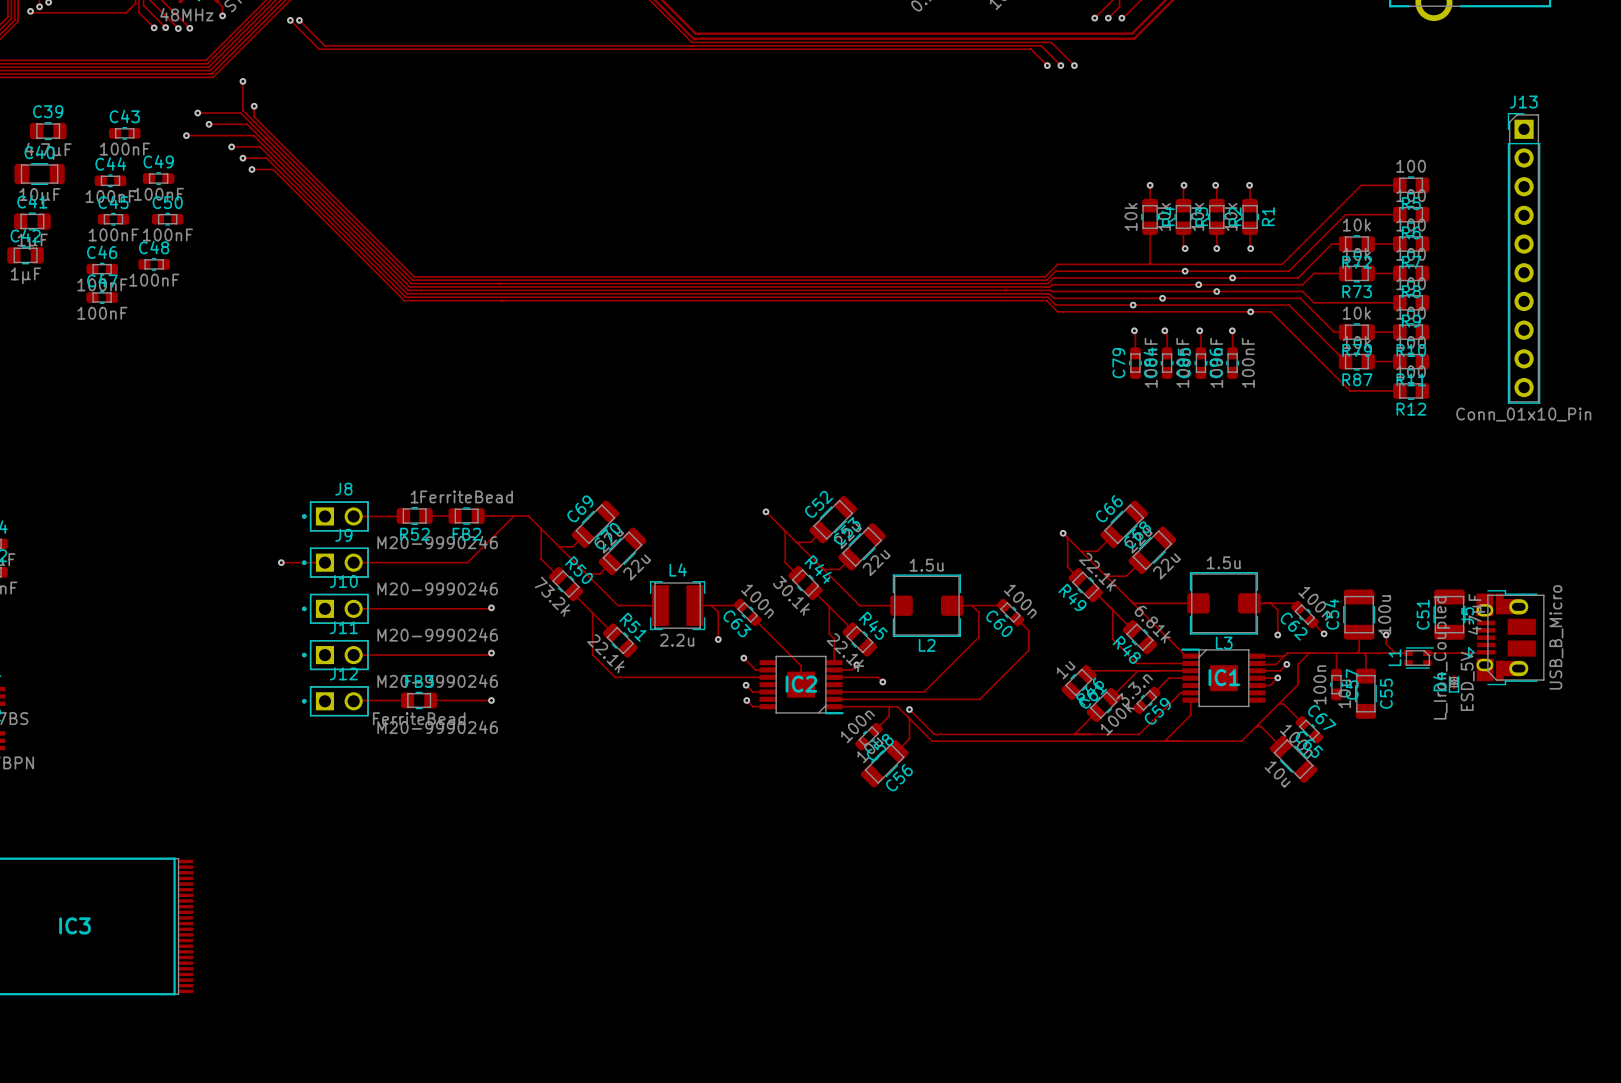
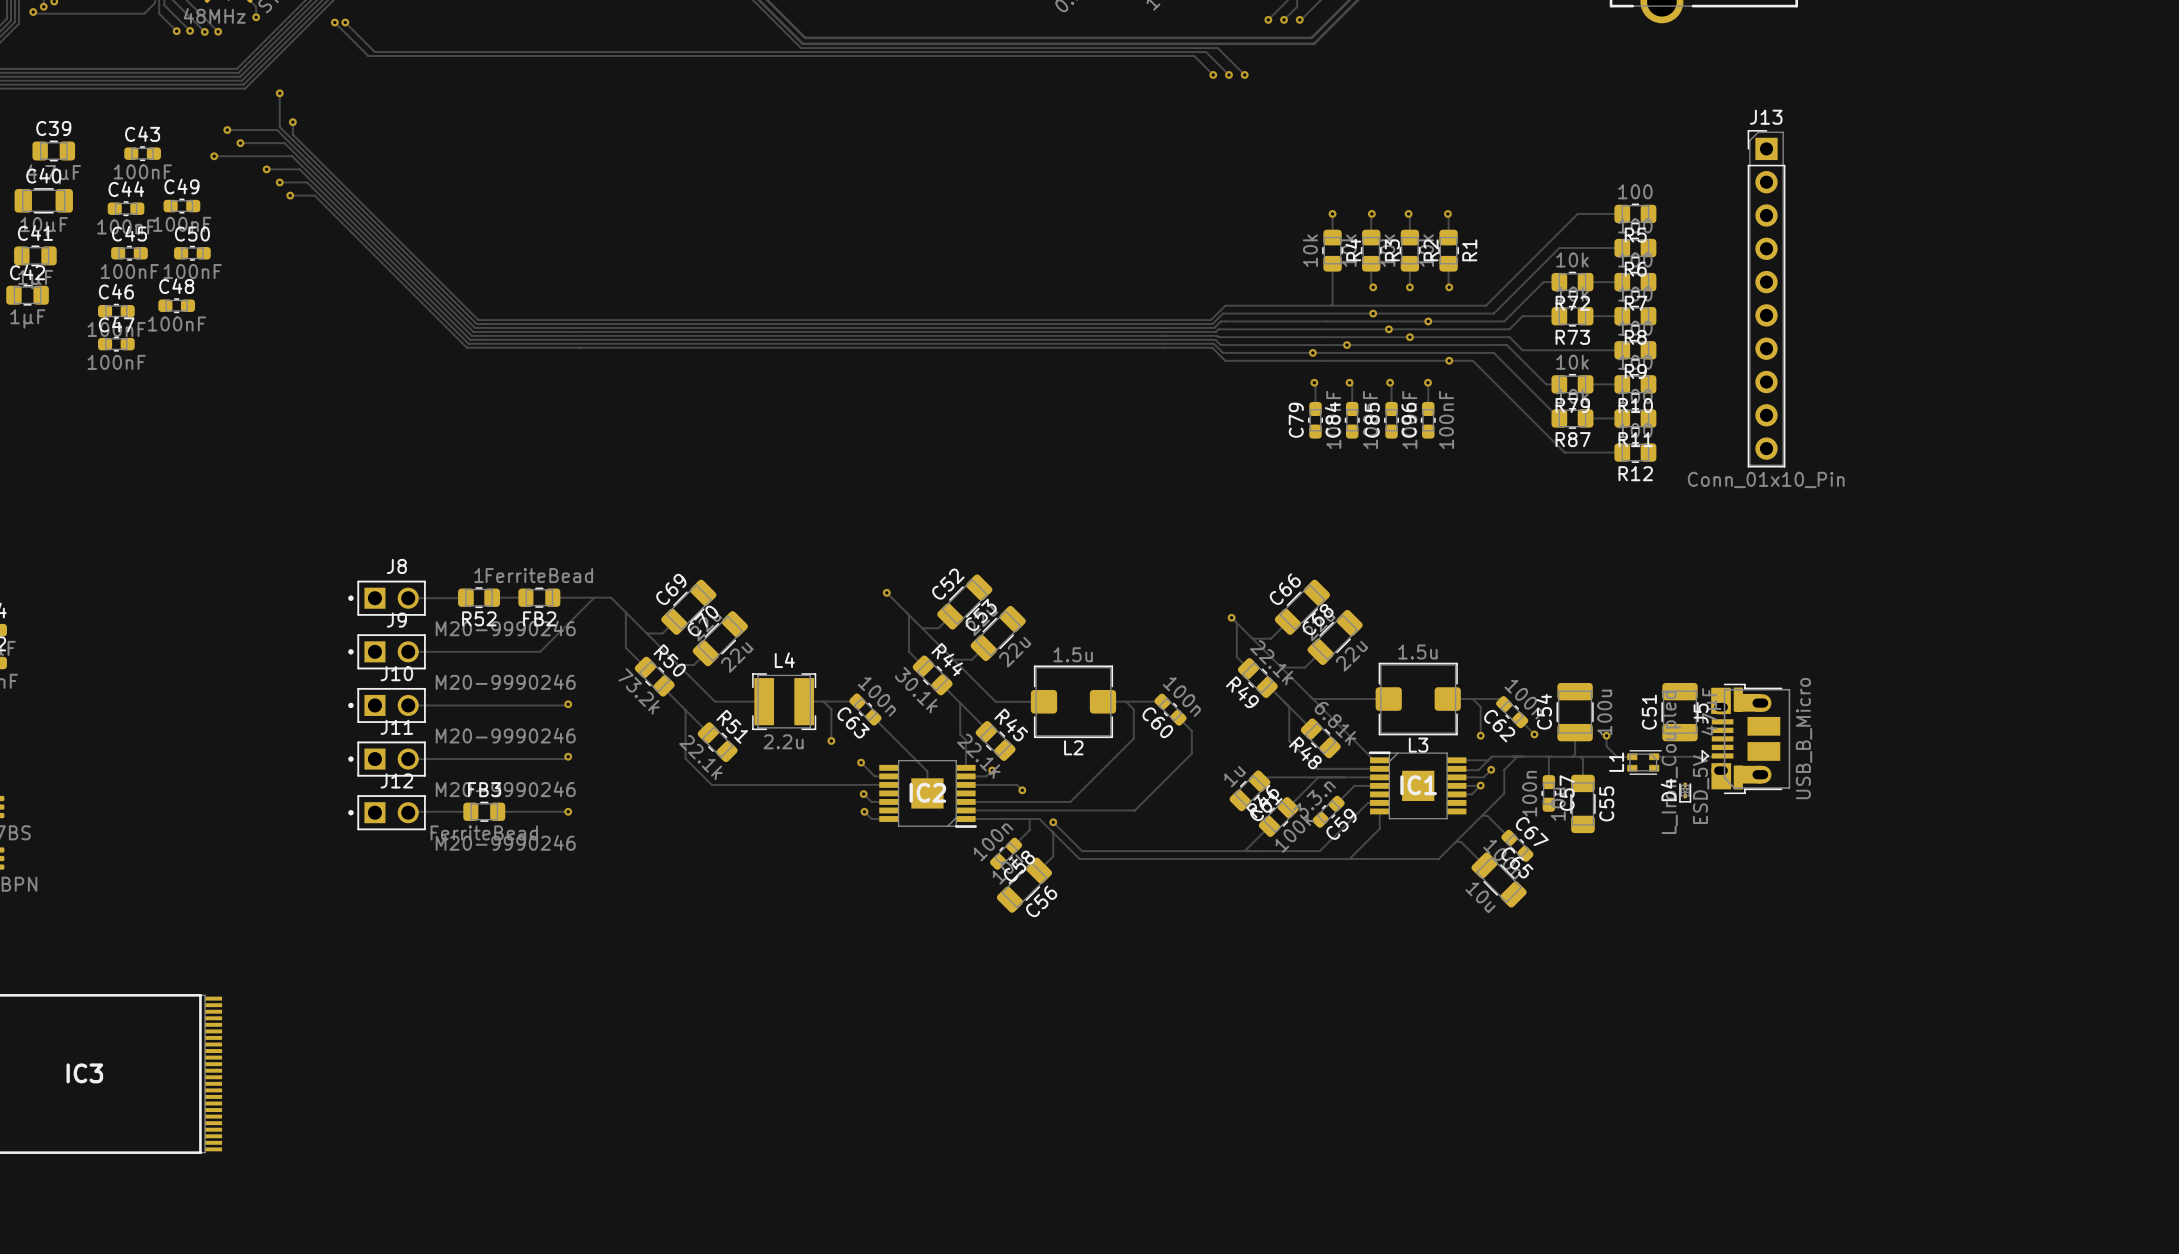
track: (281, 562) (324, 562) -> none
via: (281, 562) -> none

